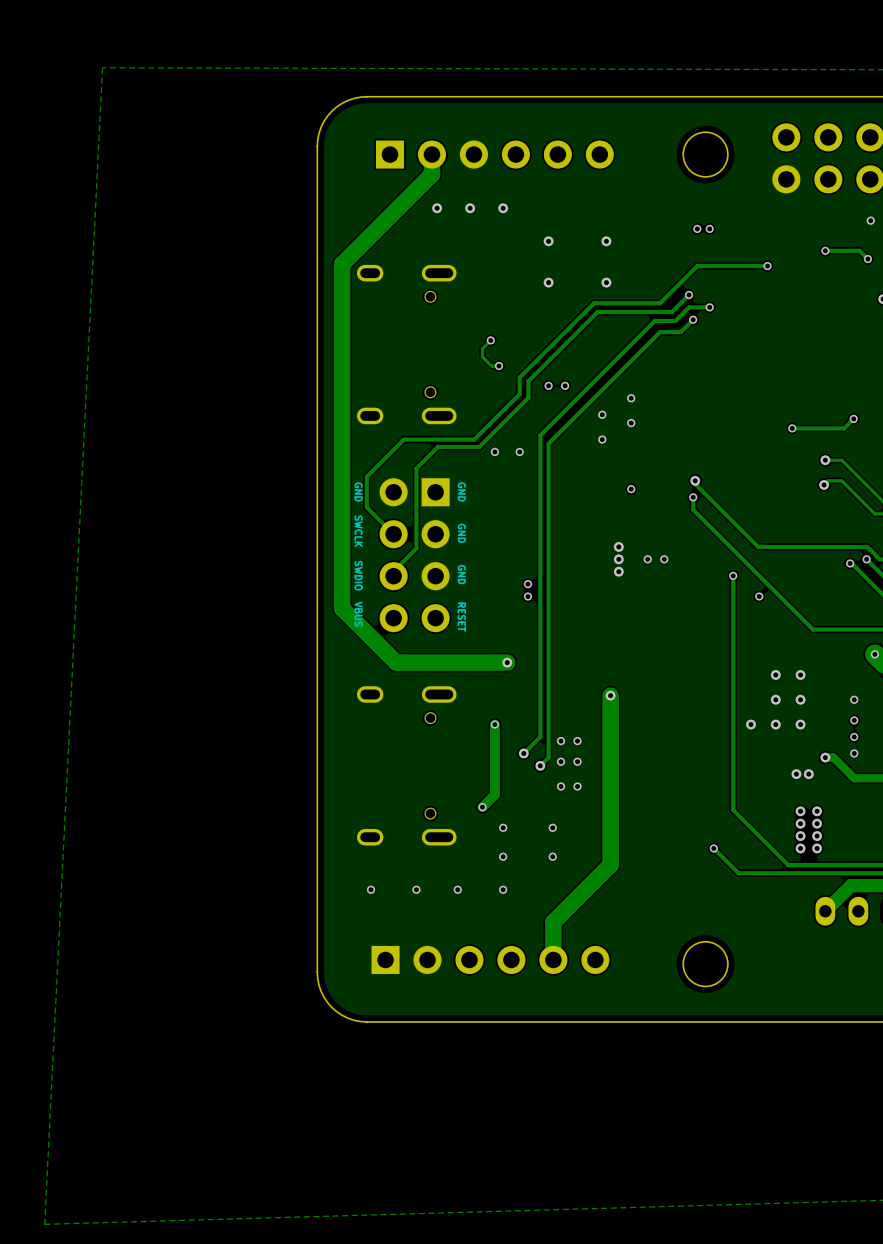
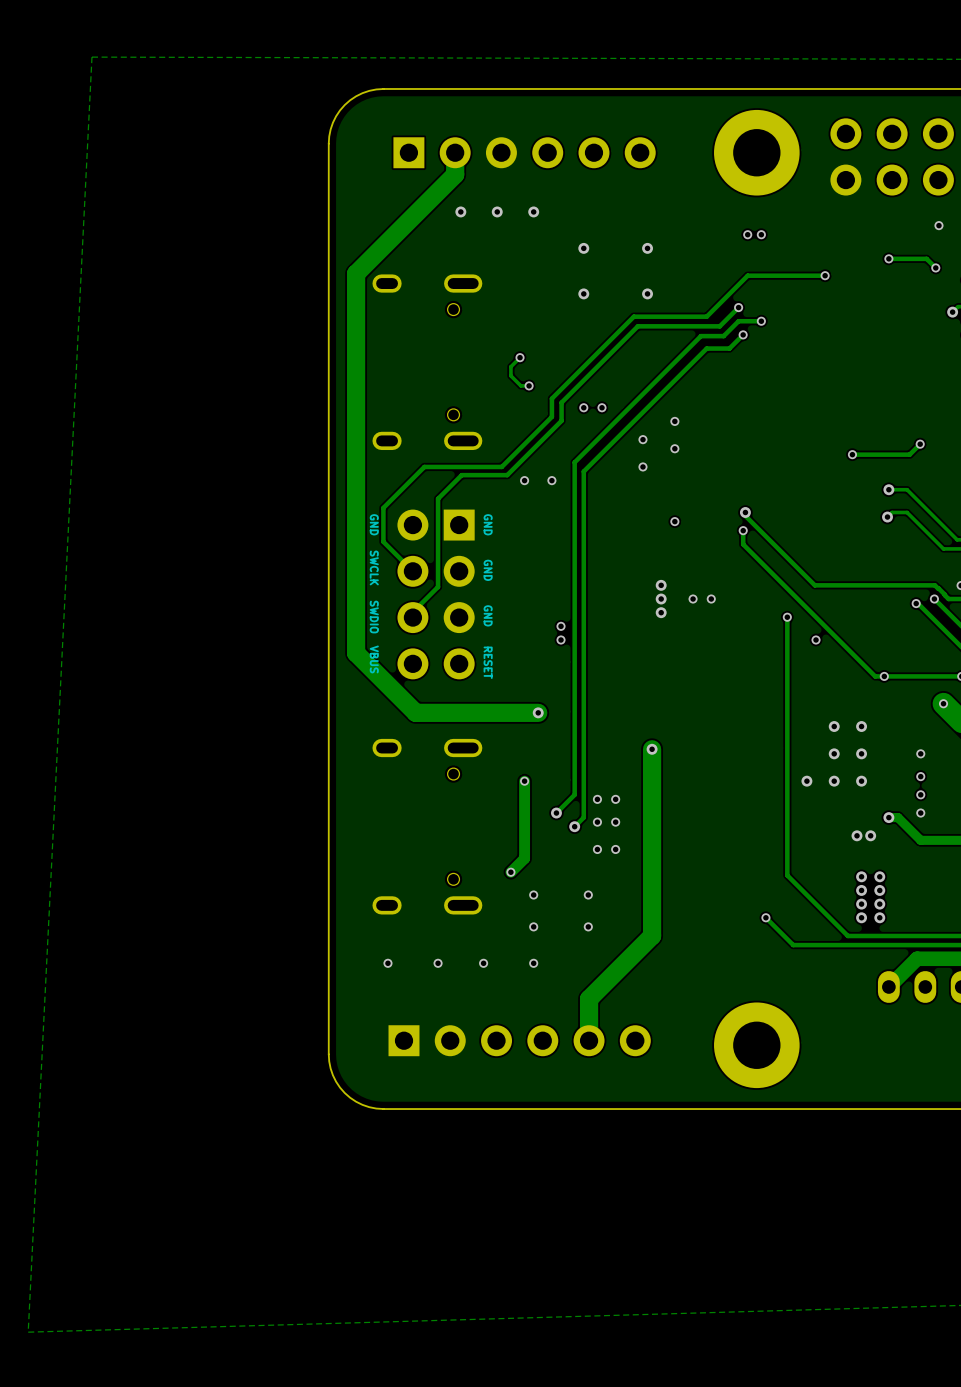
part: none -> (756, 152)
via: none -> (884, 676)
part: none -> (756, 1045)

